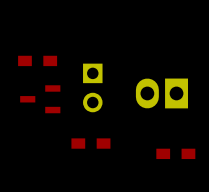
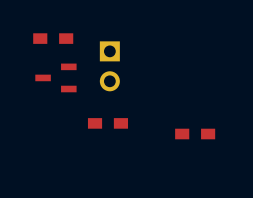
part: (161, 93) -> none

